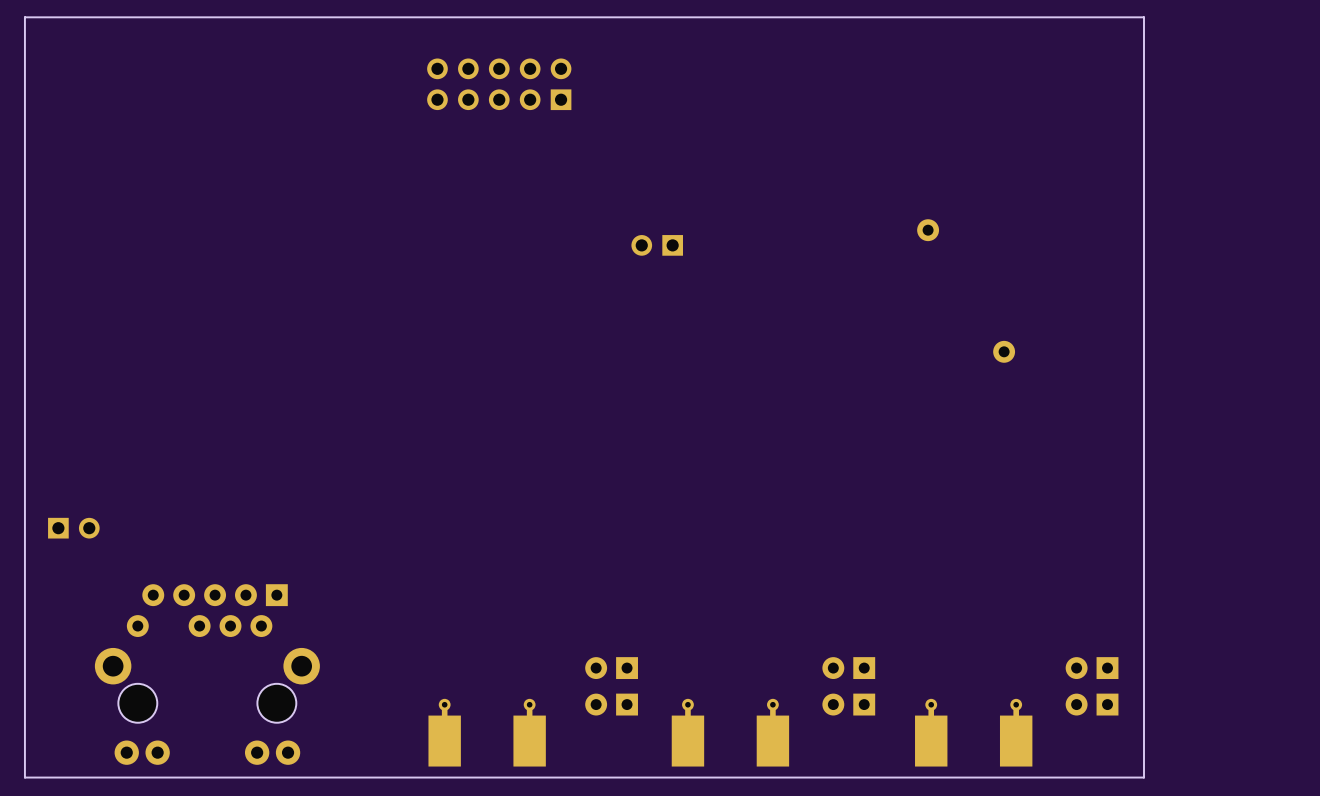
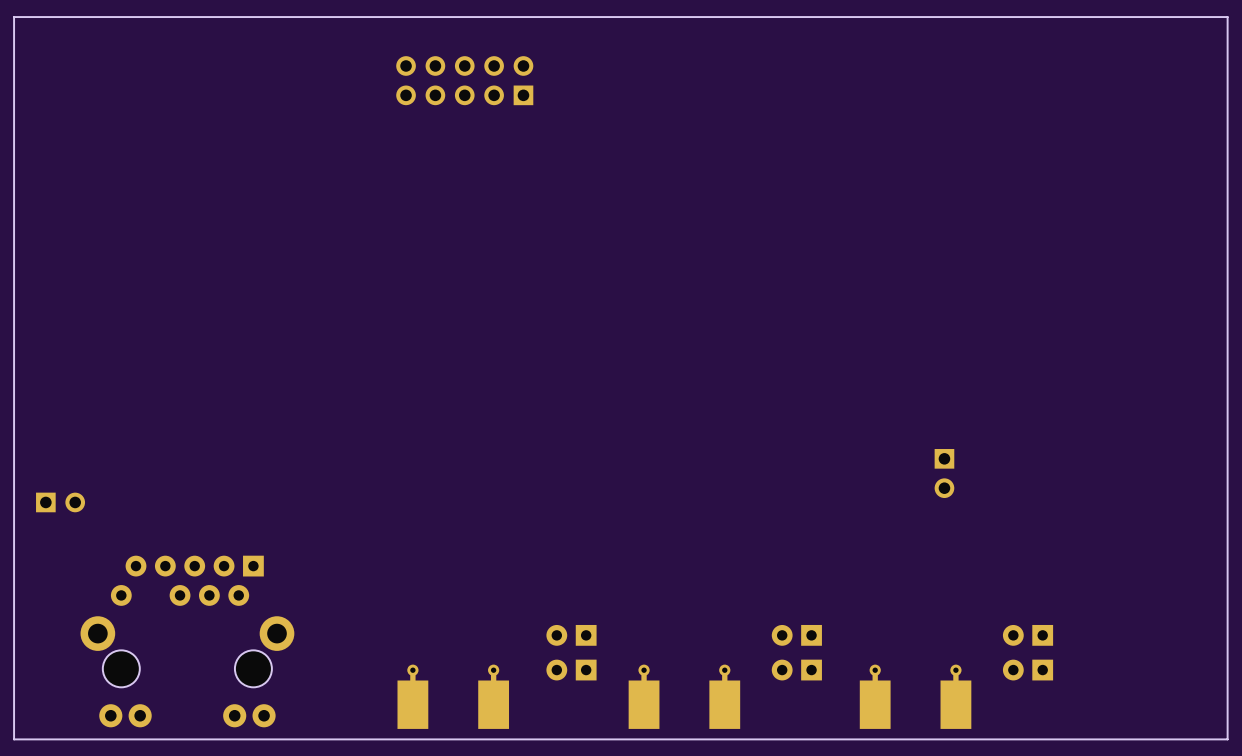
board edge: (1143, 17) (1143, 777) -> (1077, 17) (1227, 17) (1227, 739) (1077, 739)
part: (928, 230) -> none
part: (657, 245) -> none
part: (1004, 351) -> none
part: none -> (944, 473)

